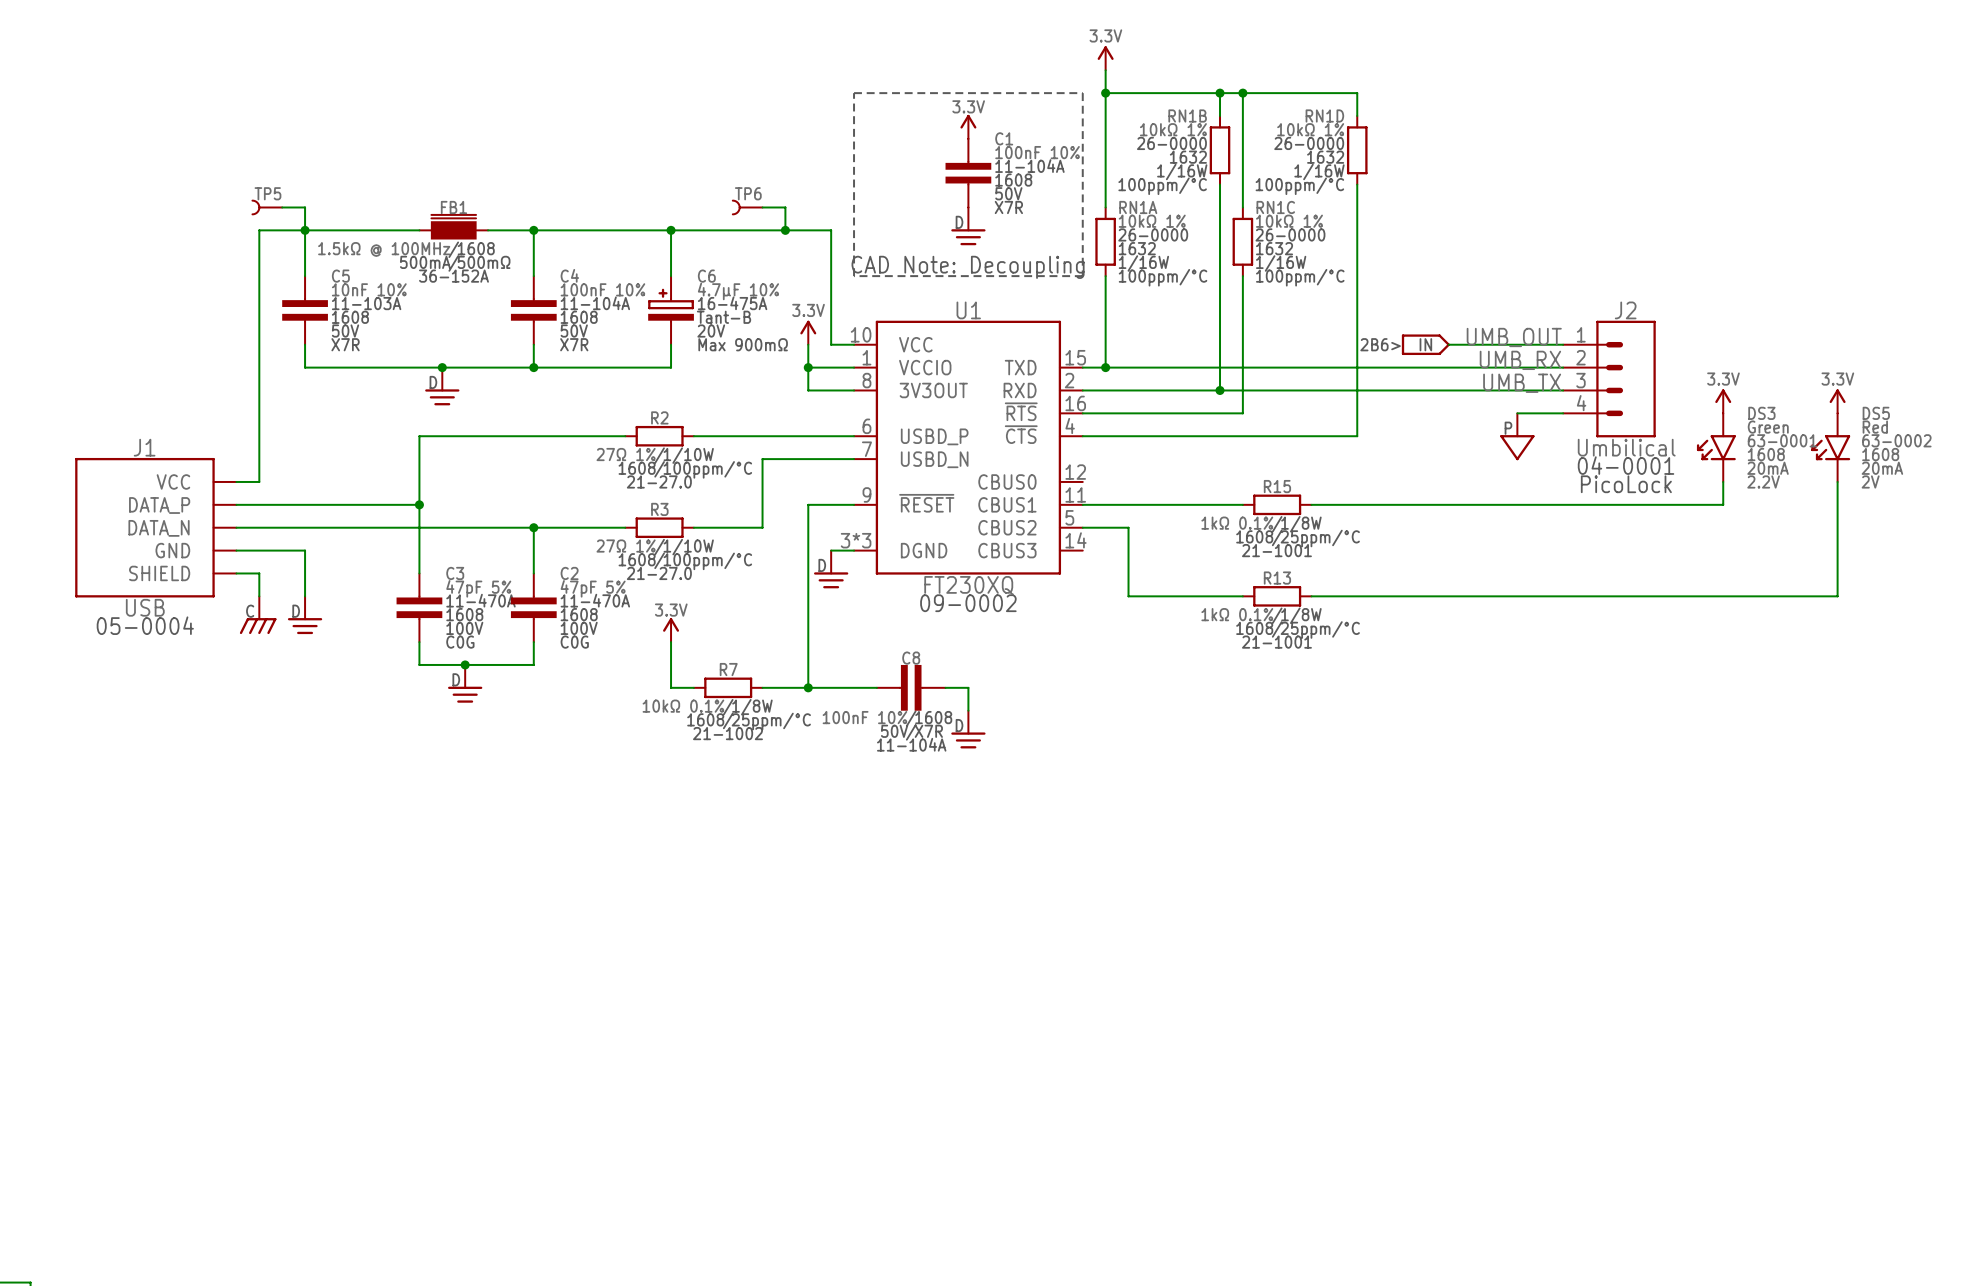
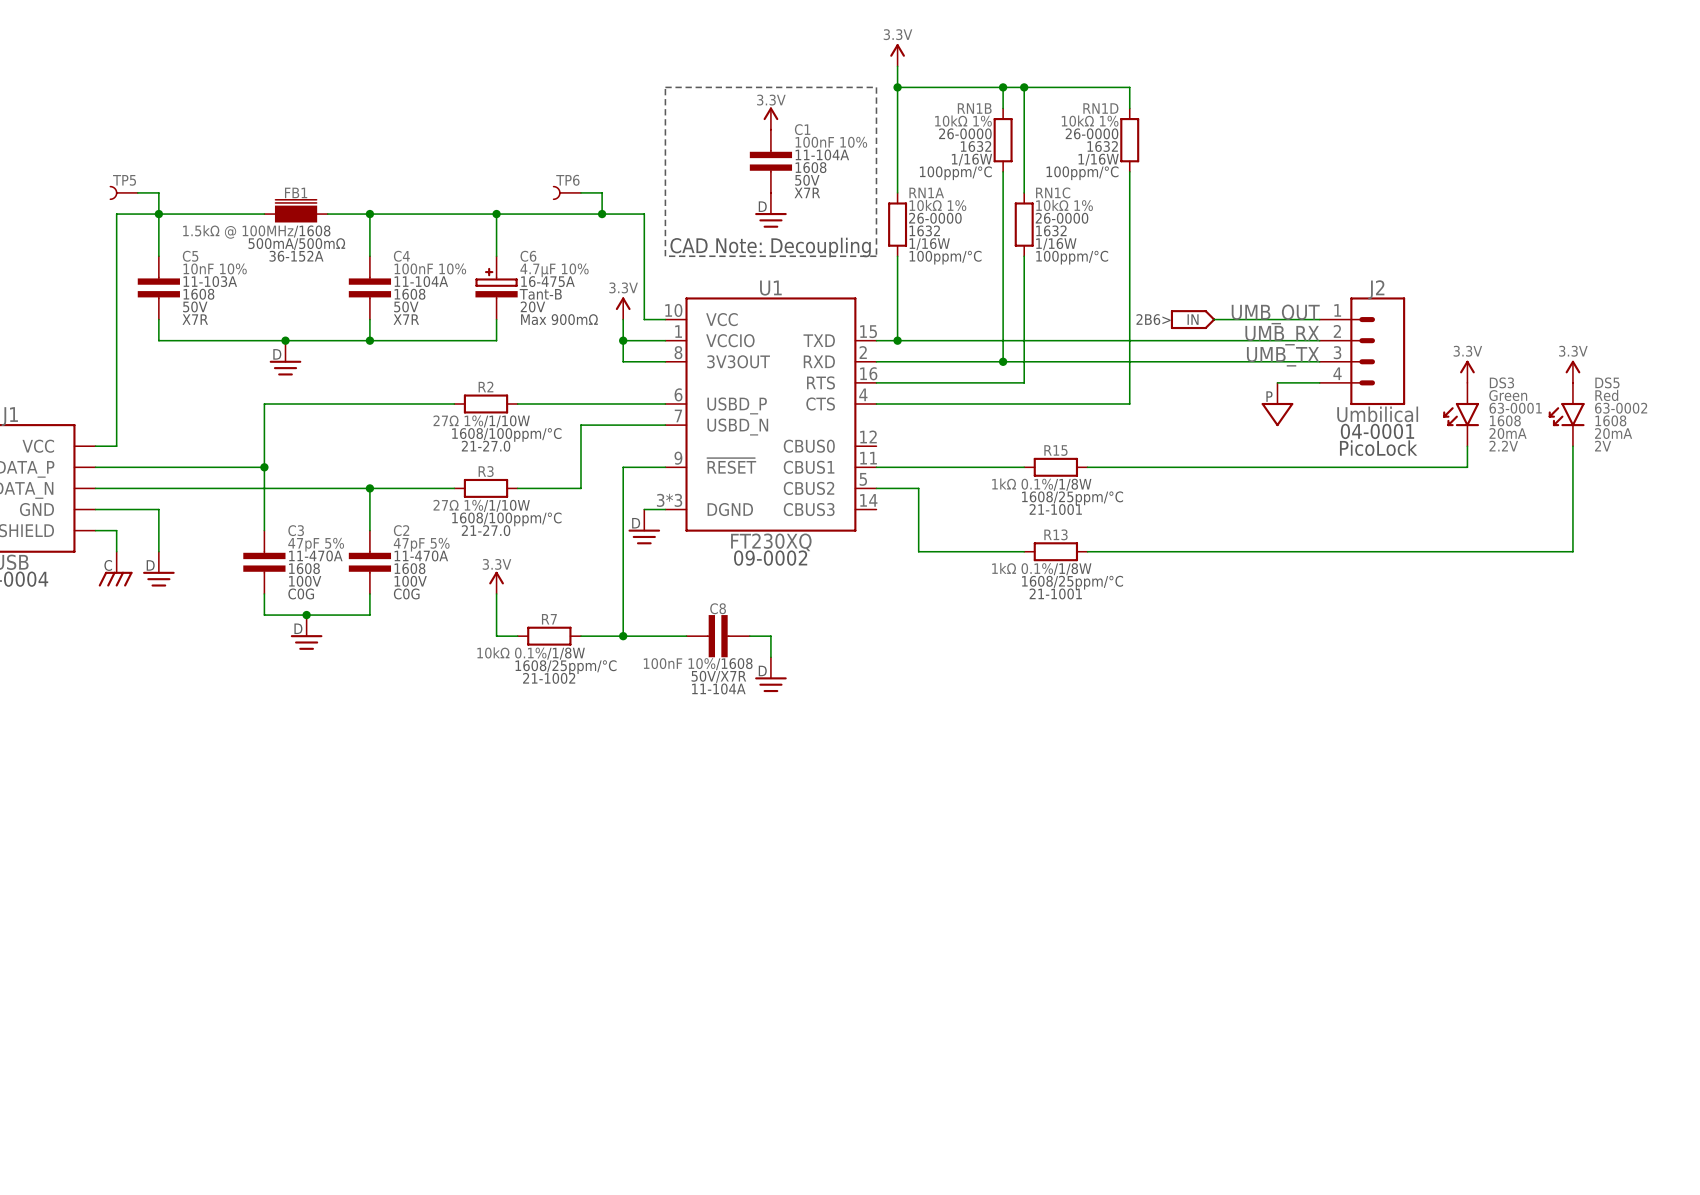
U1 pin name: ~{RTS} (1021, 411) -> RTS (821, 382)
U1 pin name: ~{CTS} (1021, 434) -> CTS (820, 404)

